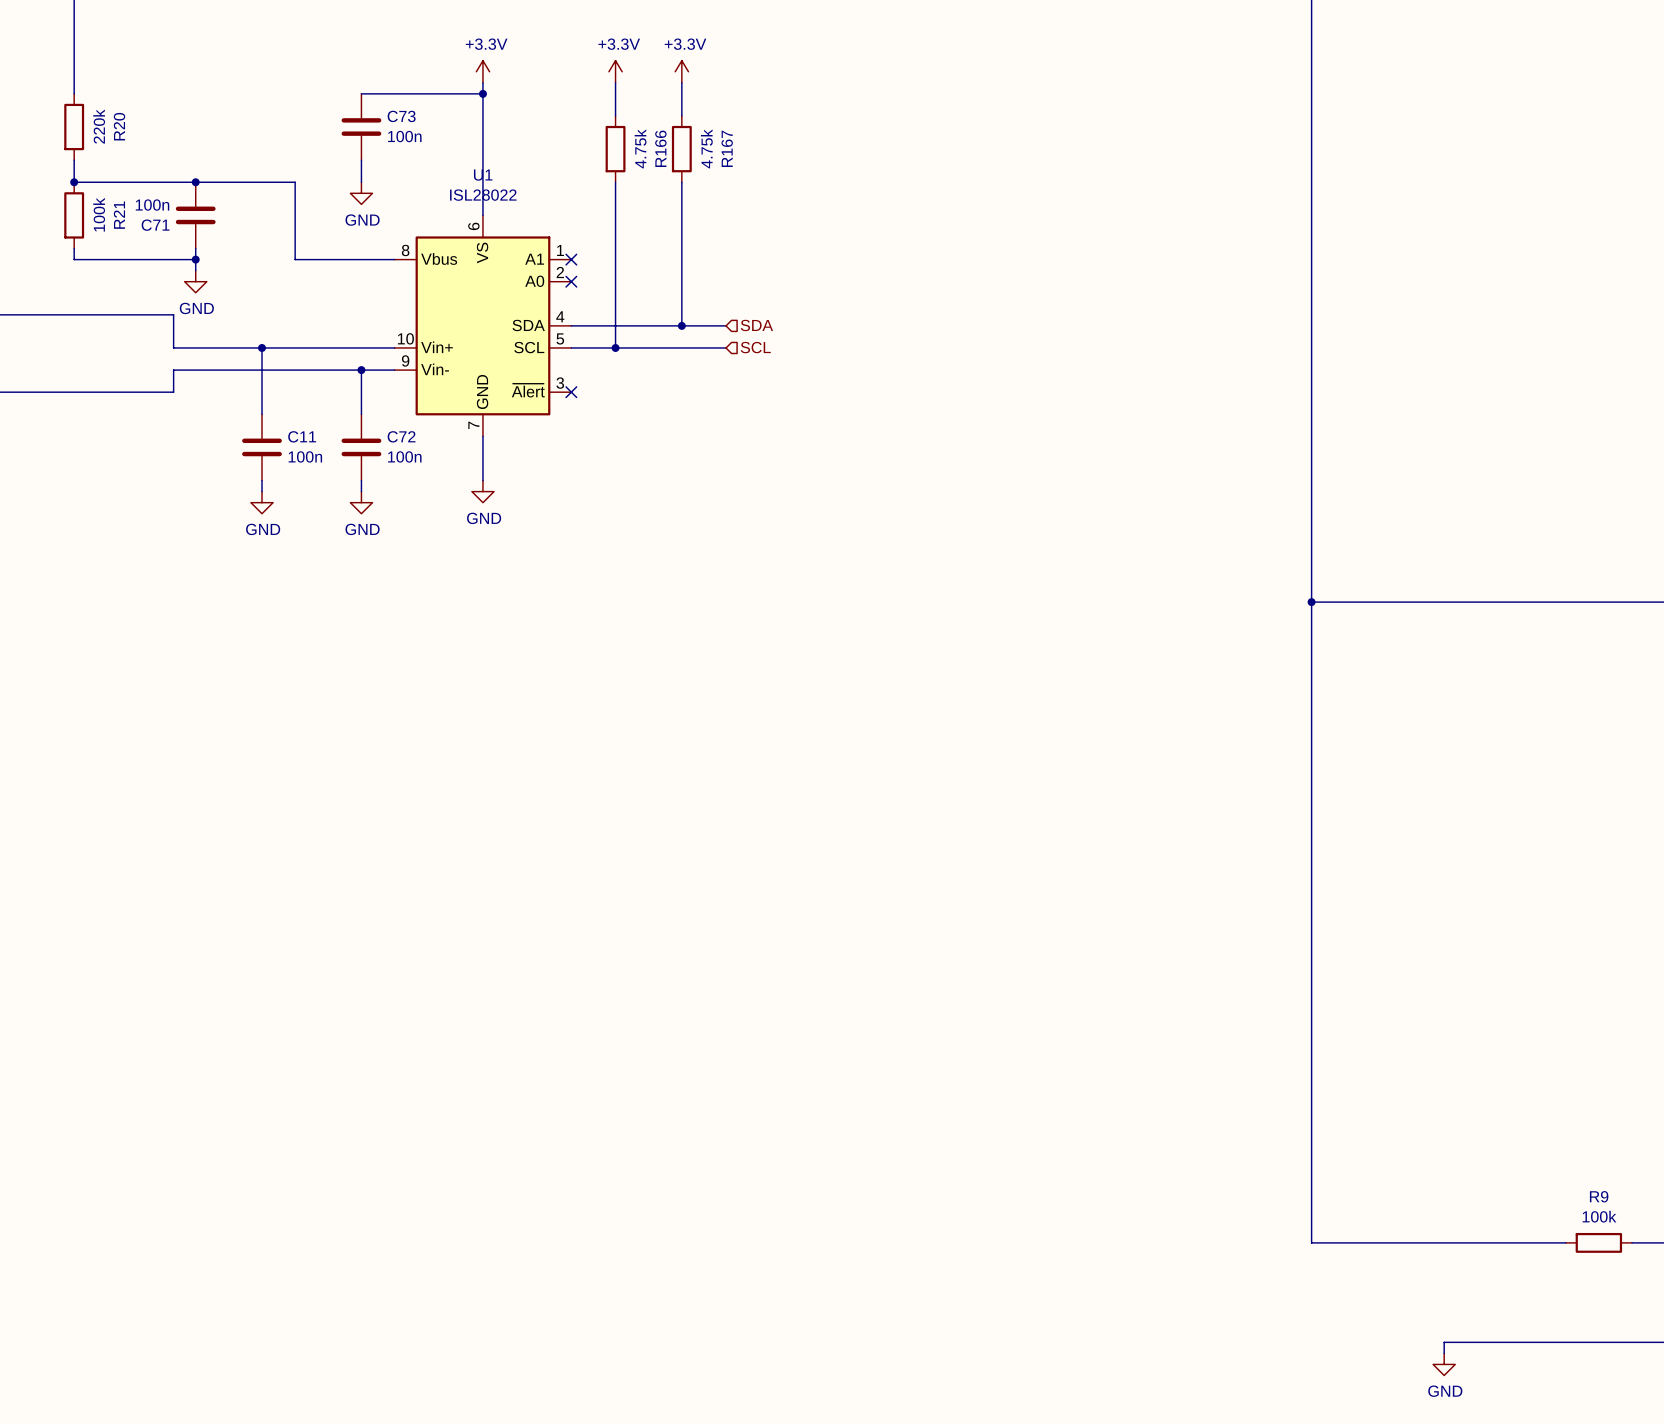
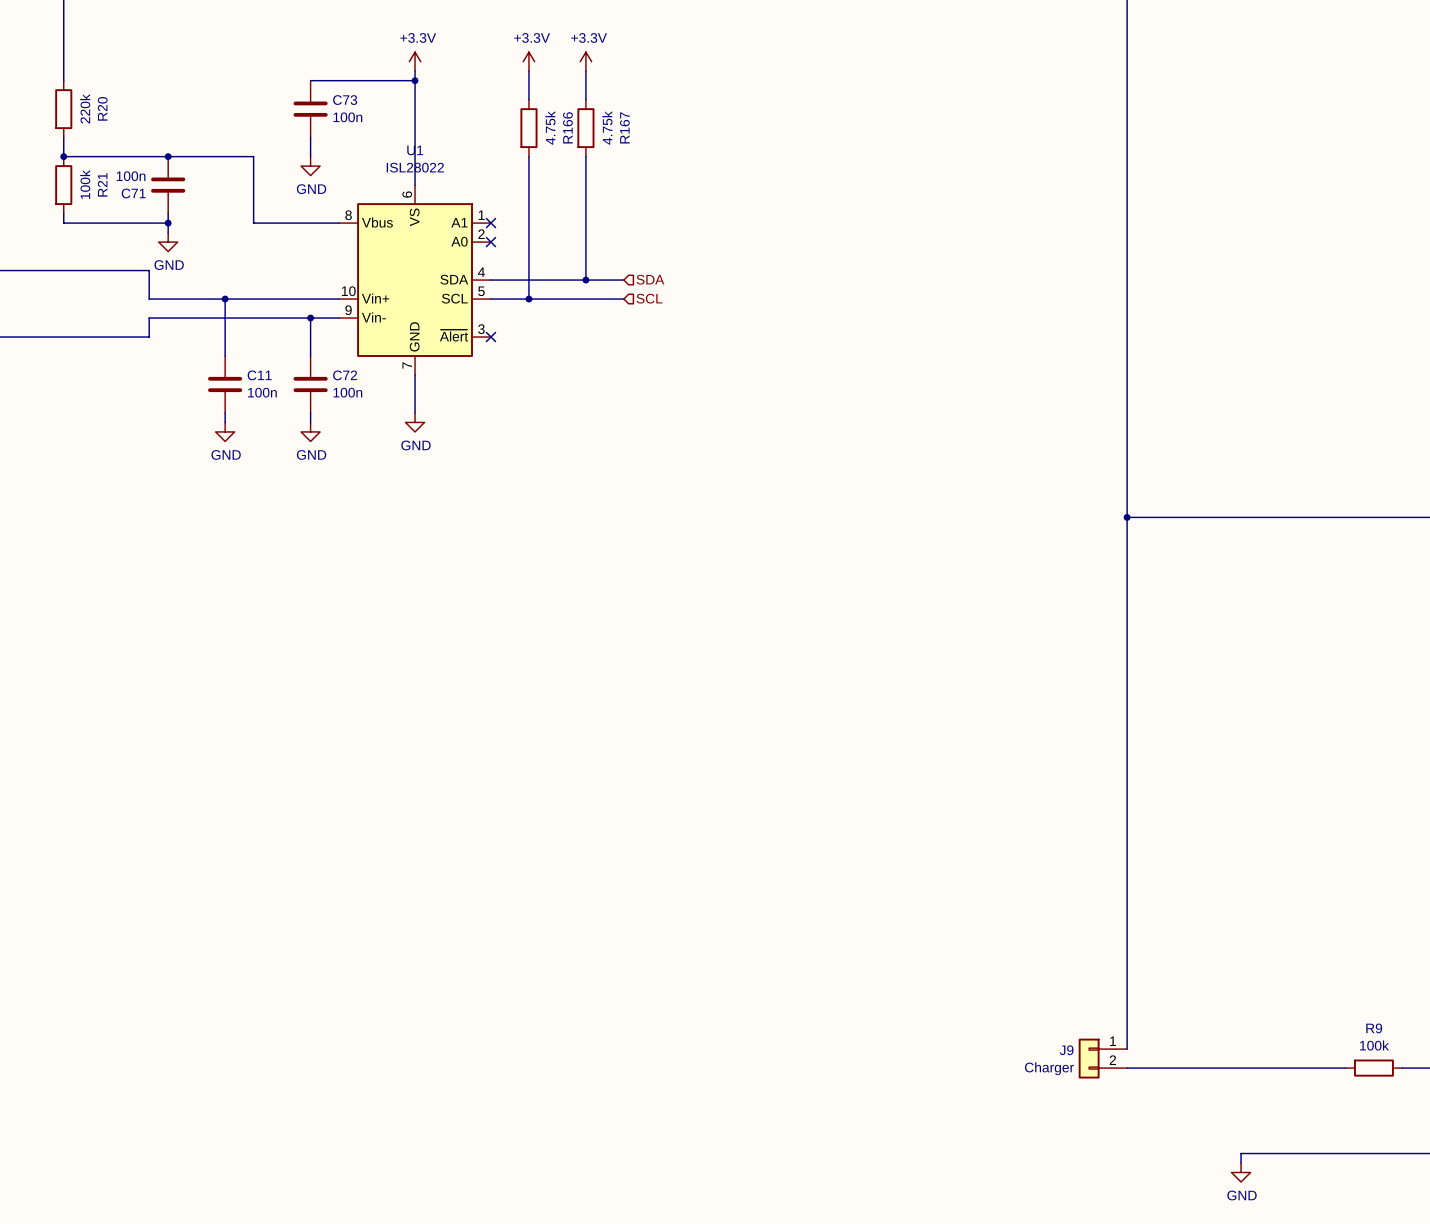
wire: (1311, 1220) (1311, 1242) -> none
J9: none -> Charger (1102, 1058)

